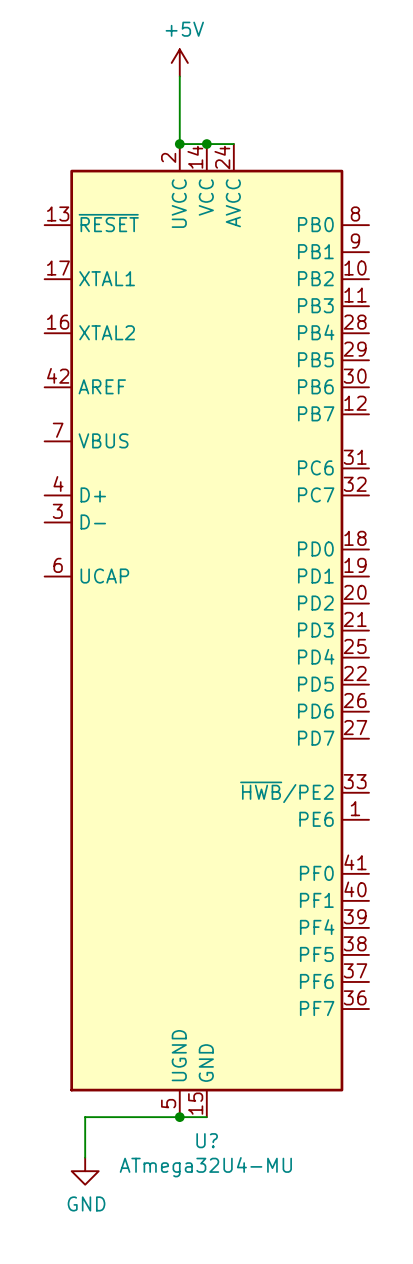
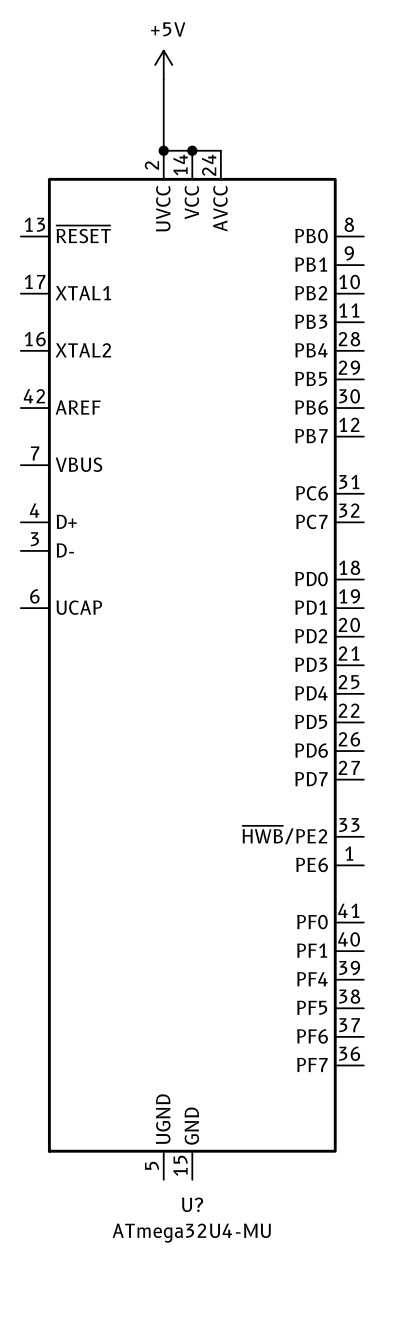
junction: (179, 1117) -> none
wire: (206, 1117) (85, 1117) (85, 1157) -> none
power symbol: GND (85, 1171) -> none

